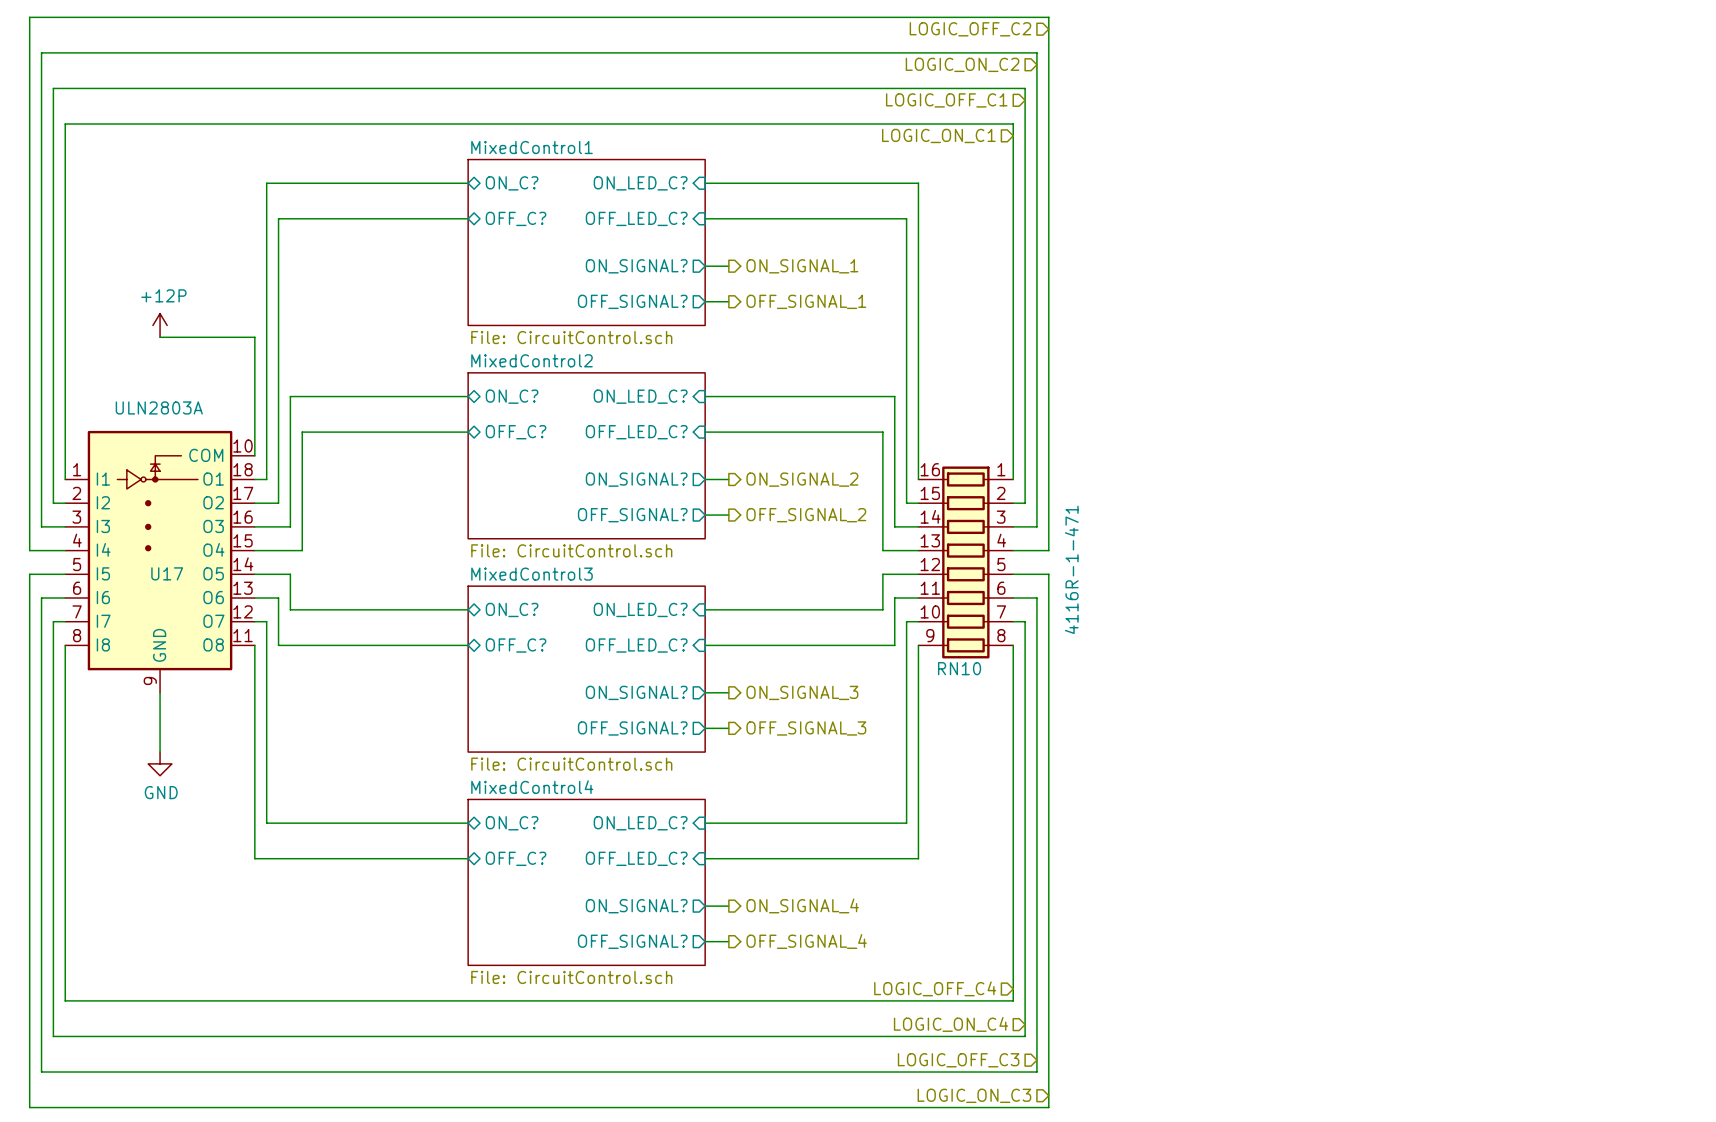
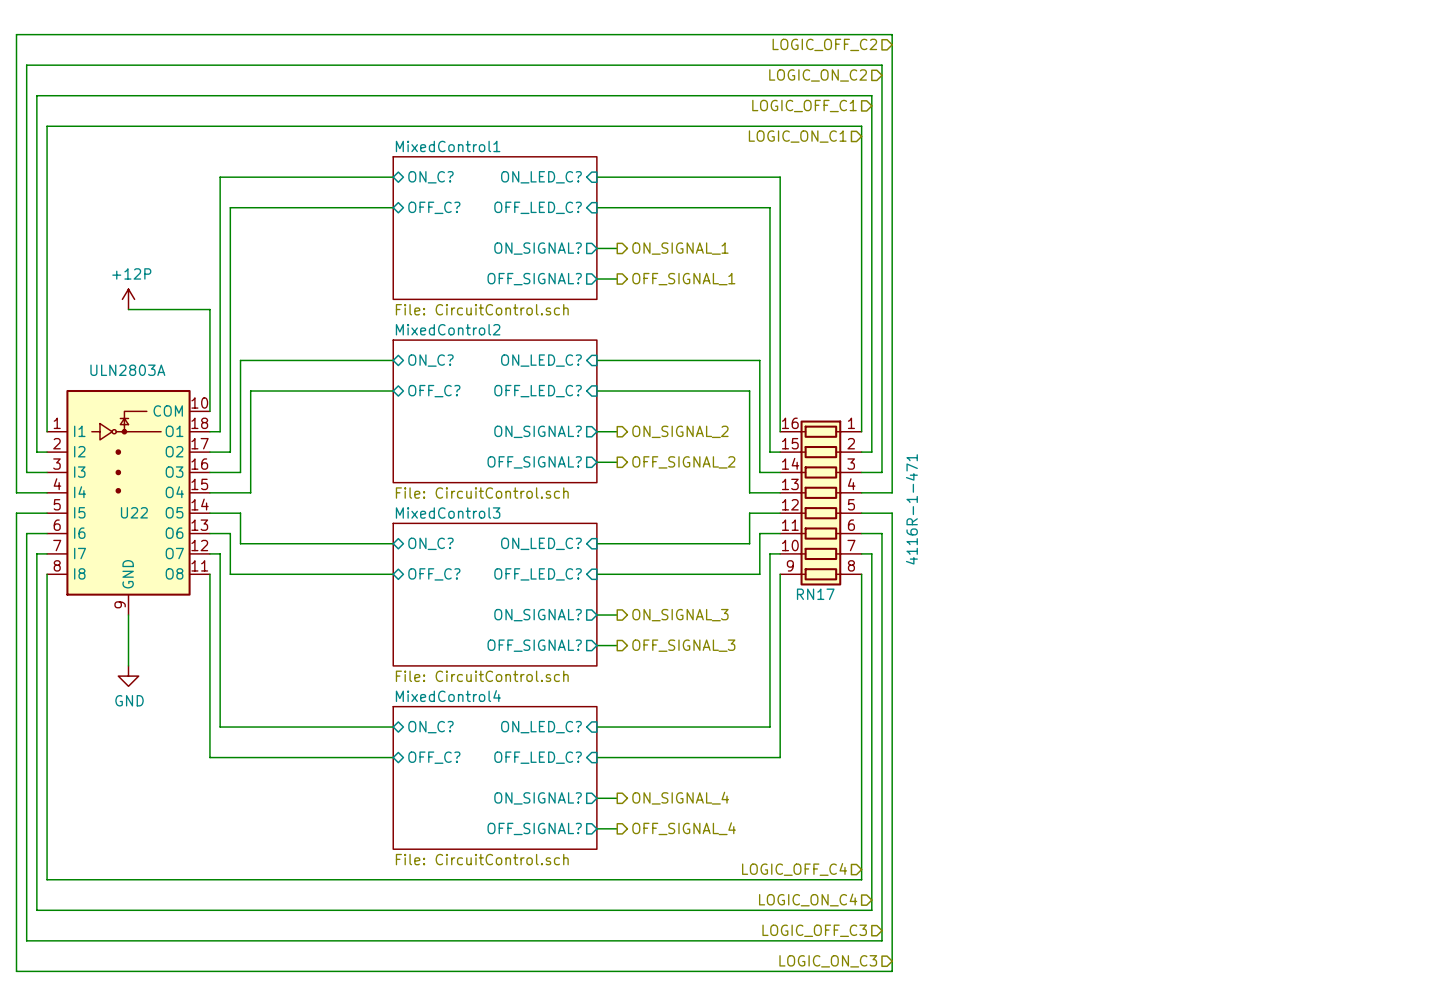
U17 name: U17 (167, 573) -> U22 (134, 512)
RN10 name: RN10 (959, 668) -> RN17 (815, 594)

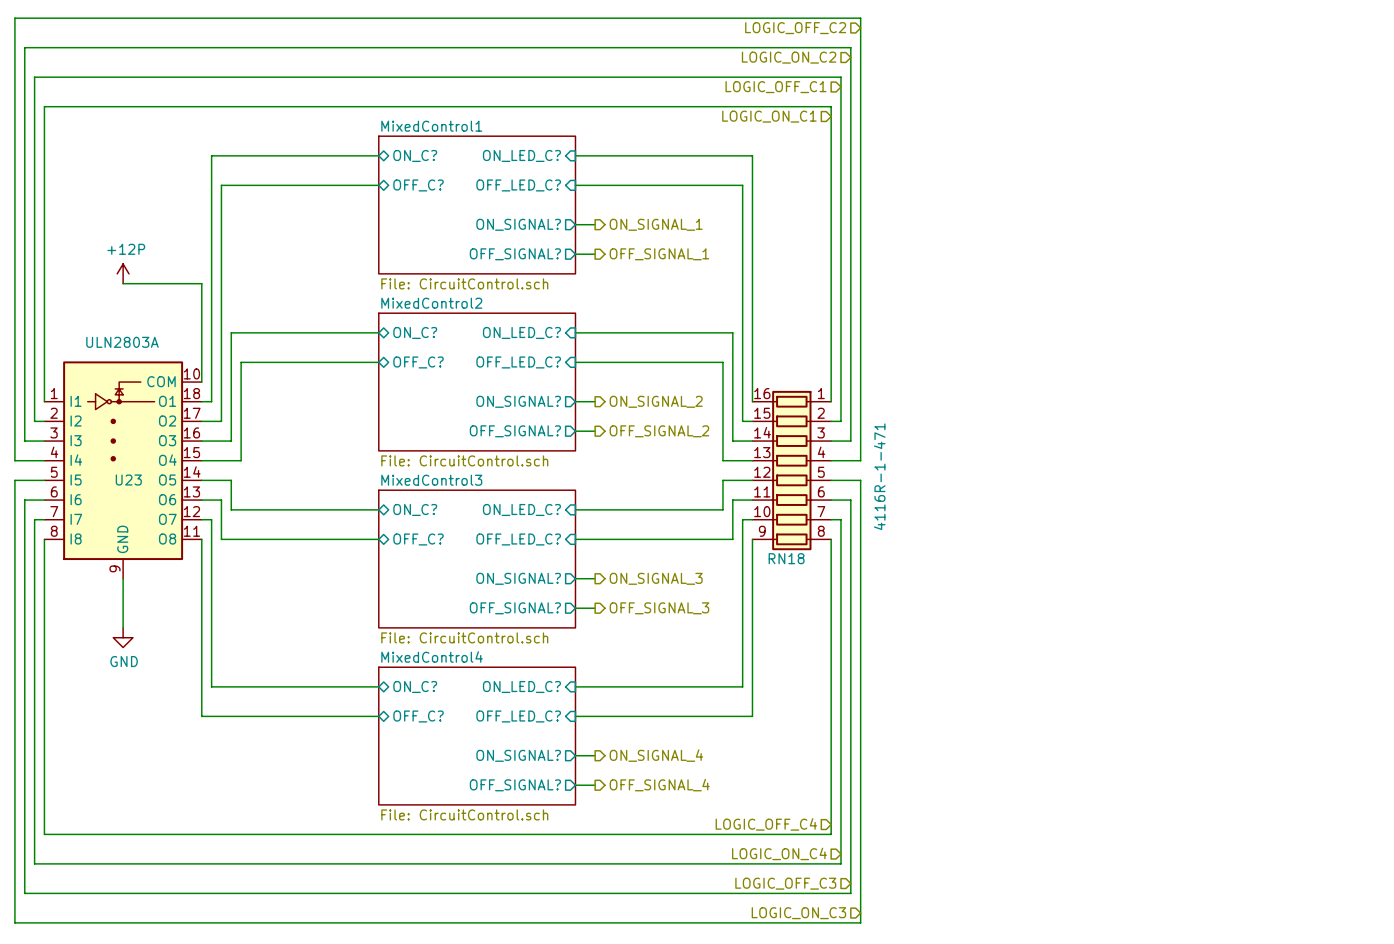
U22 name: U22 (134, 512) -> U23 (128, 480)
RN17 name: RN17 (815, 594) -> RN18 (786, 558)

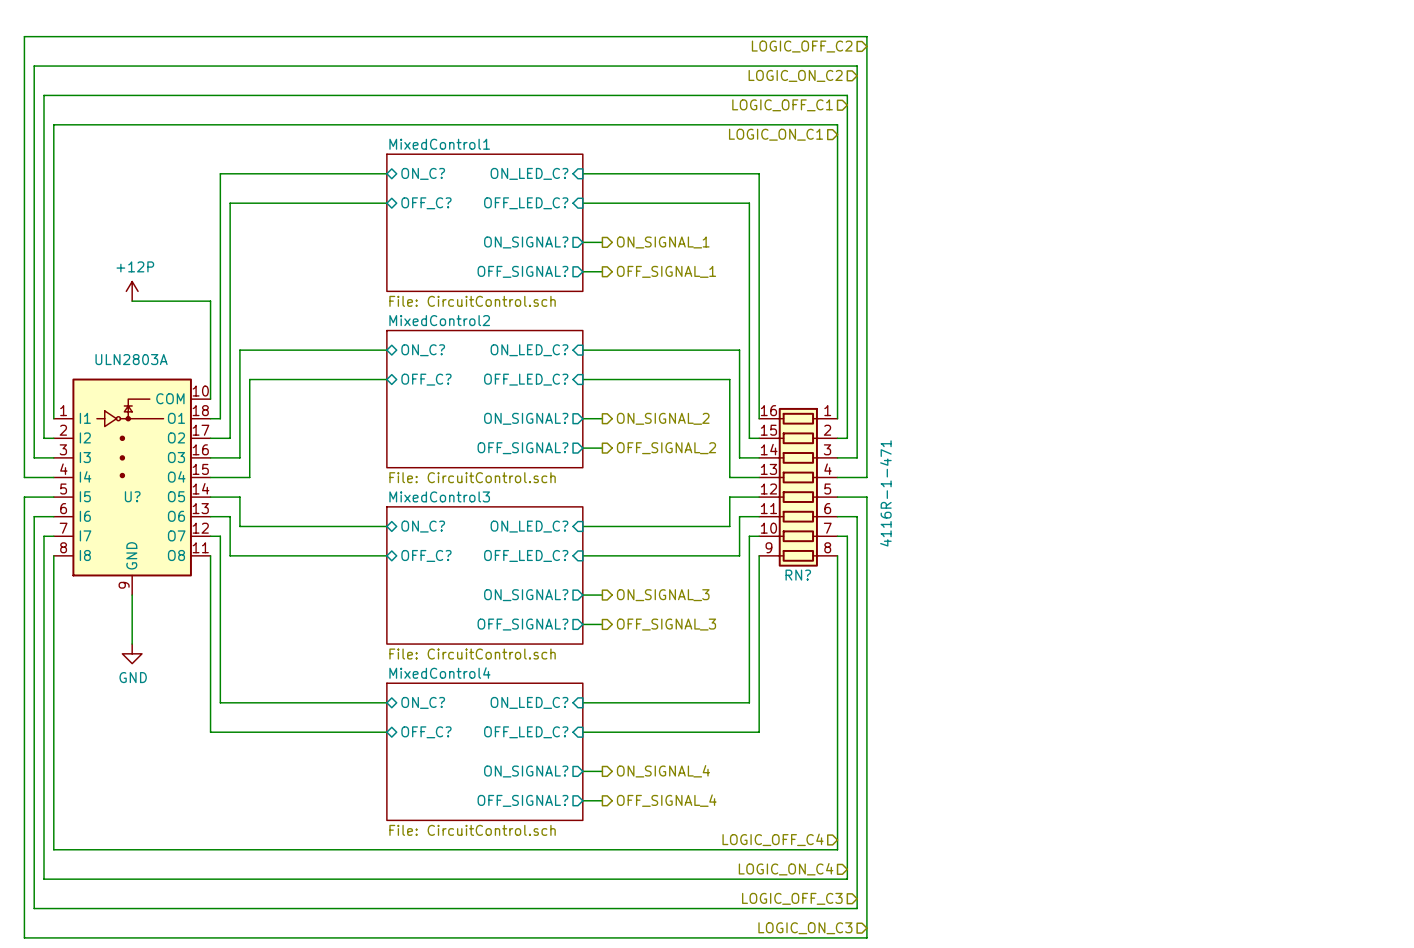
U23 name: U23 (128, 480) -> U? (132, 496)
RN18 name: RN18 (786, 558) -> RN? (798, 575)

